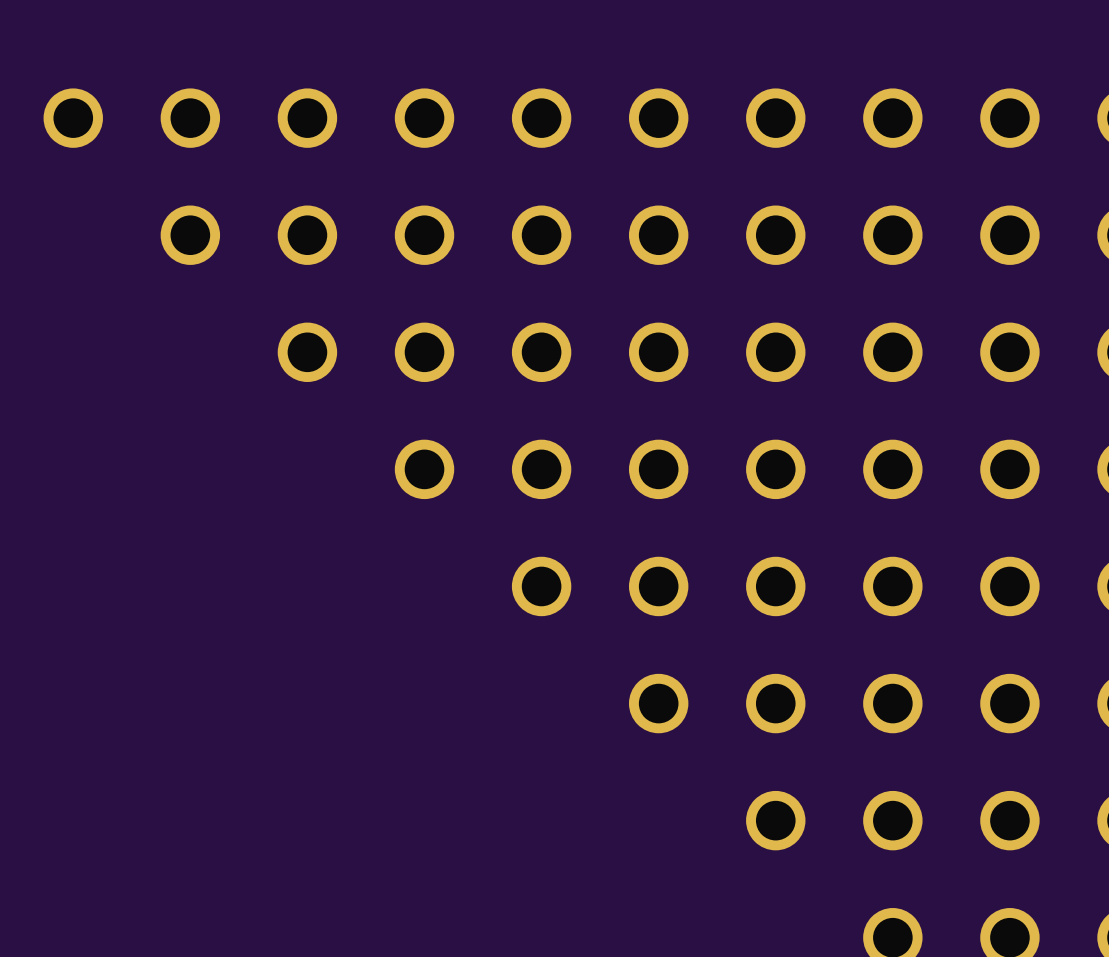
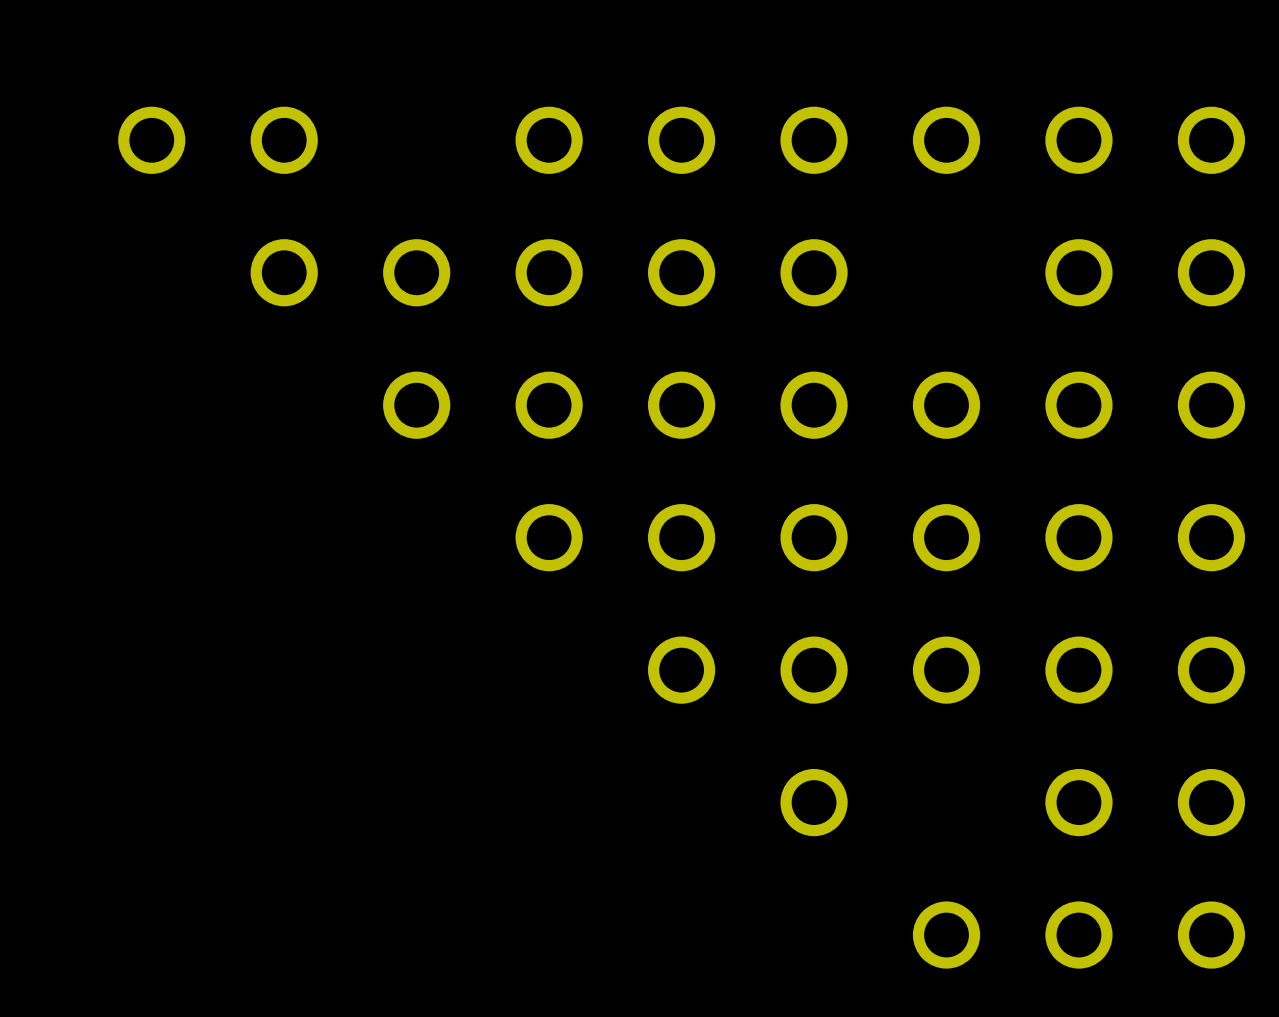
part: (307, 118) -> none
part: (775, 235) -> none
part: (775, 703) -> none

